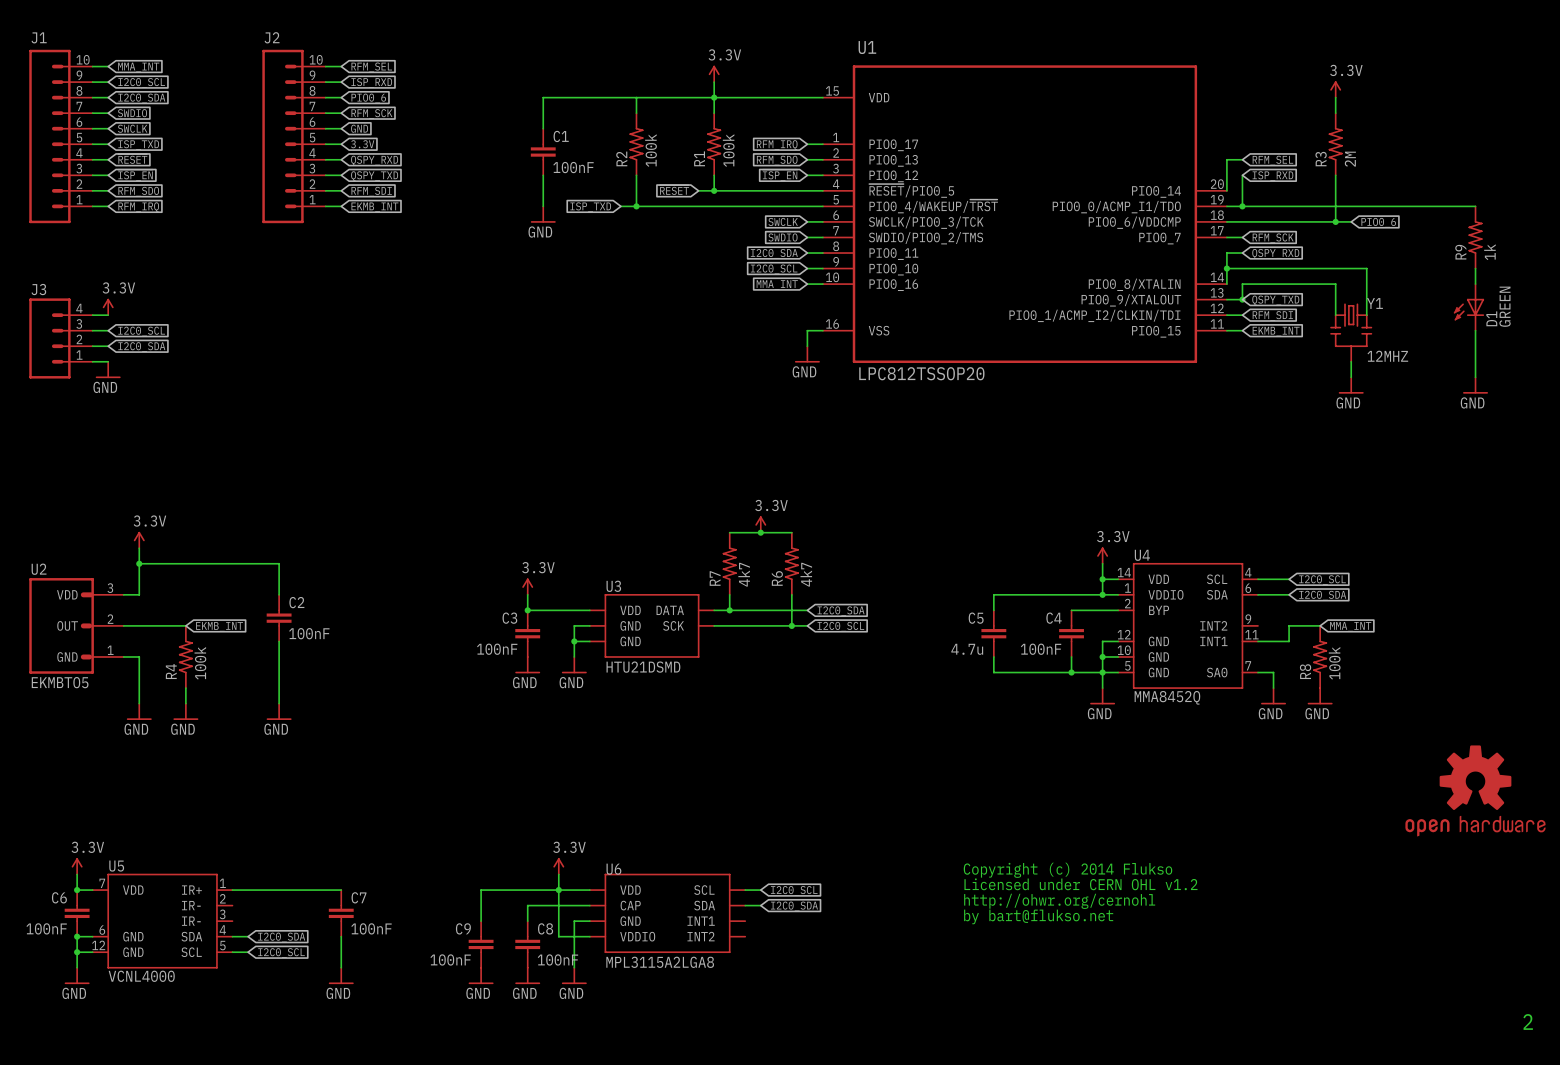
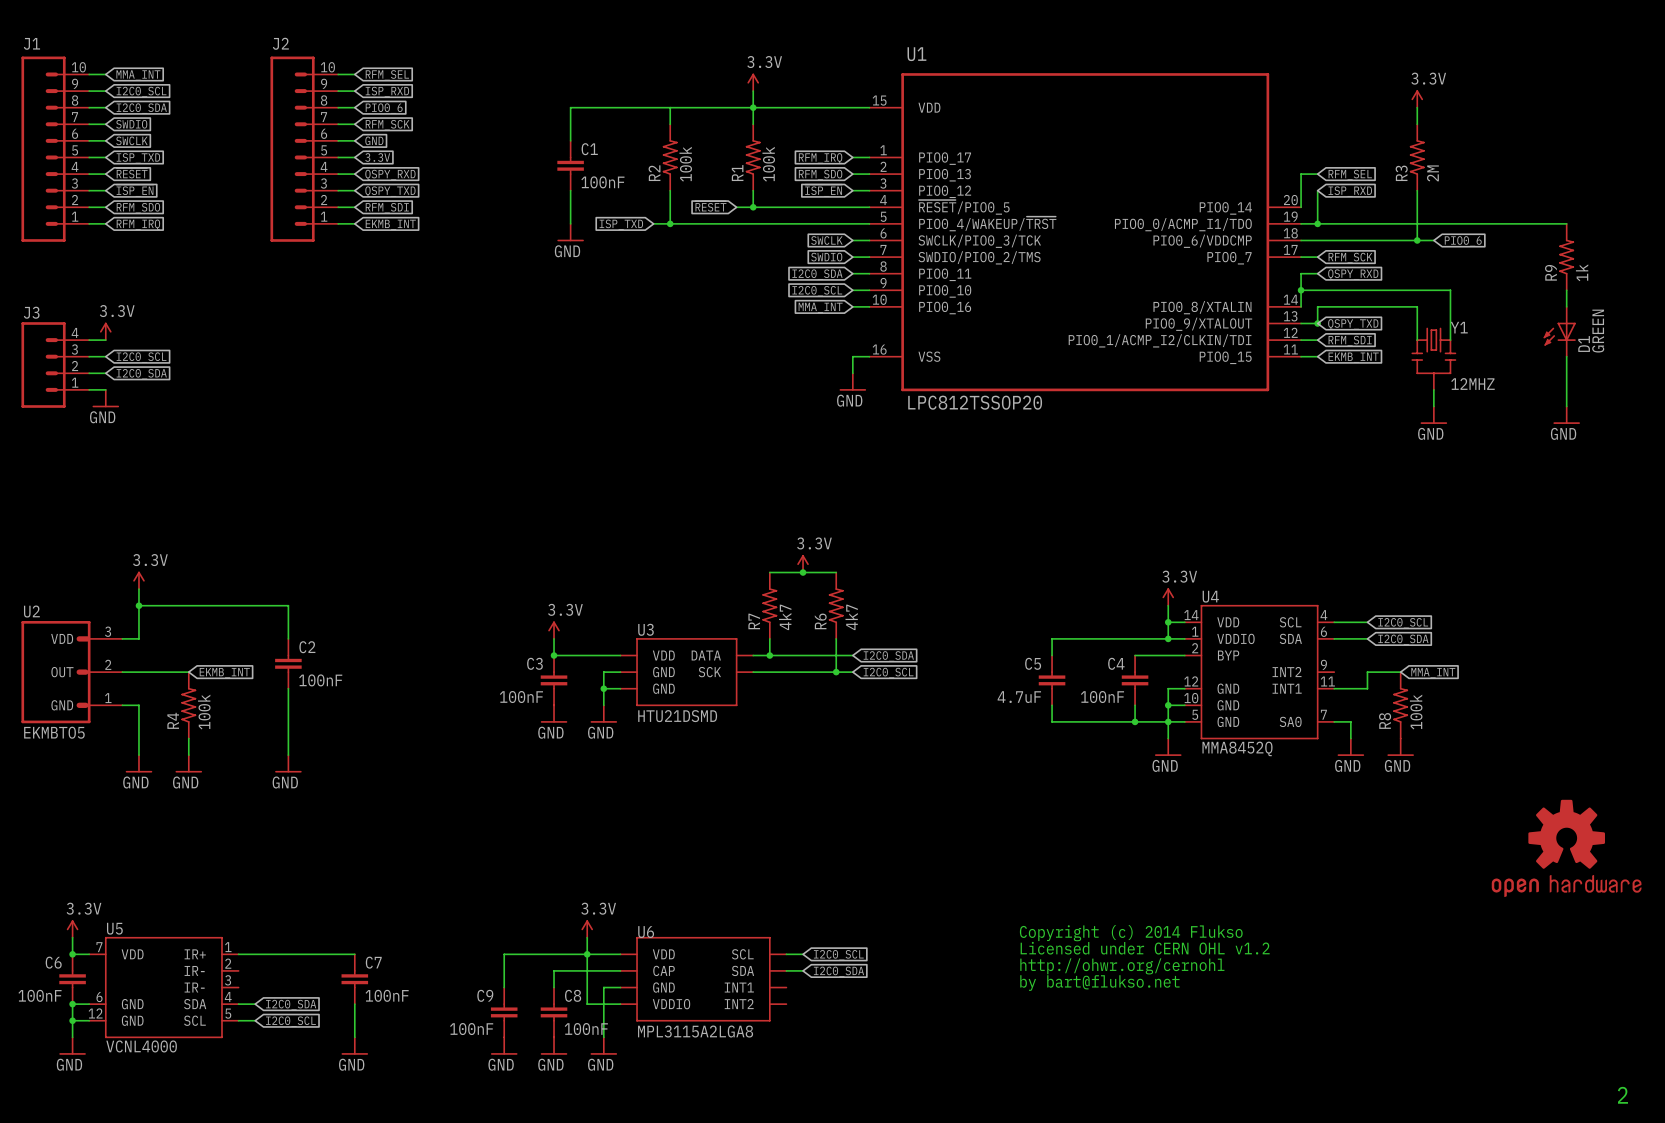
C5 value: 4.7u (967, 649) -> 4.7uF (1019, 697)

